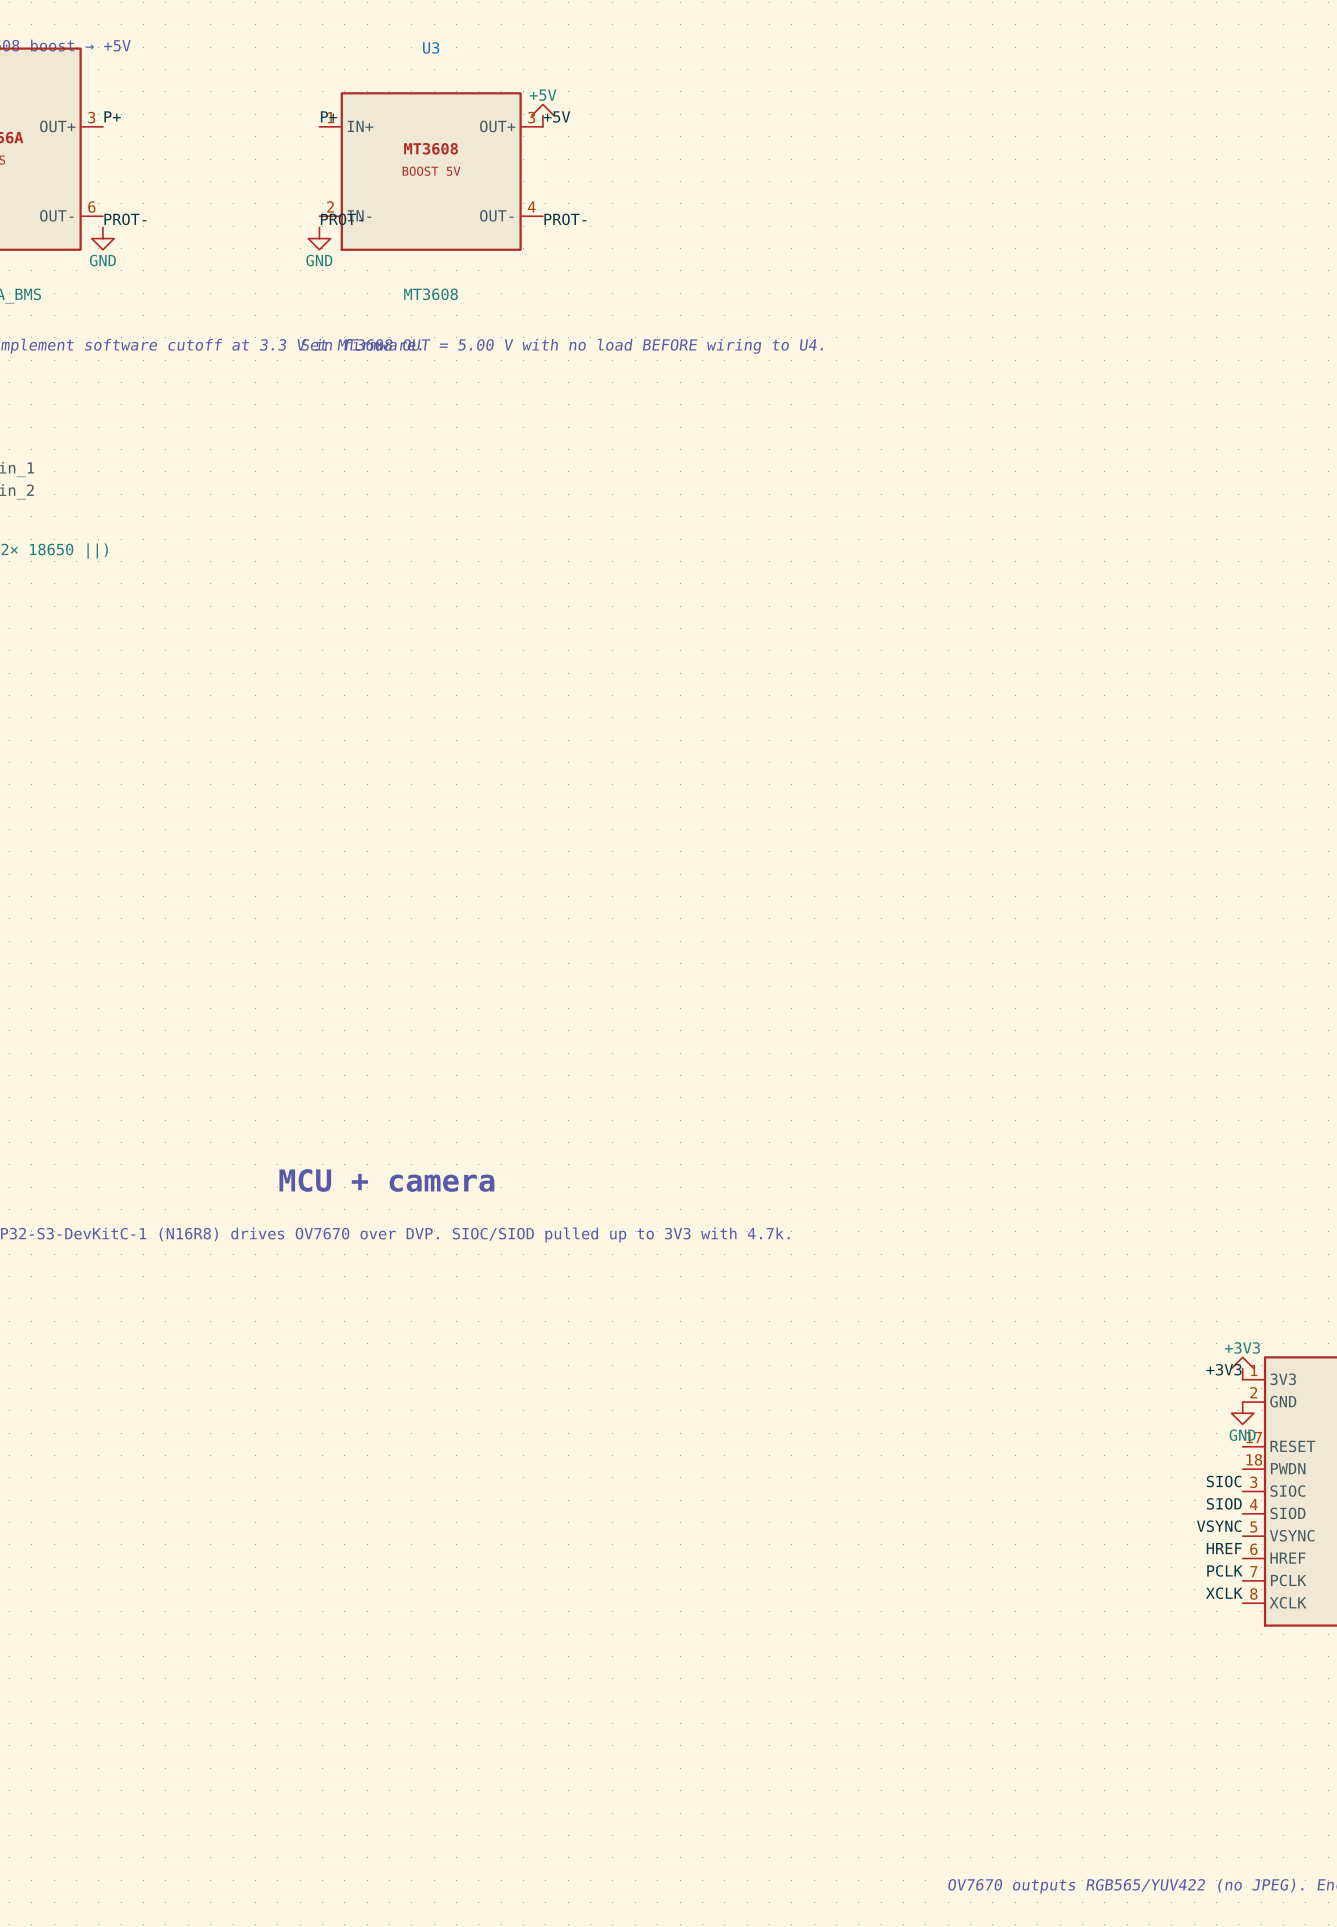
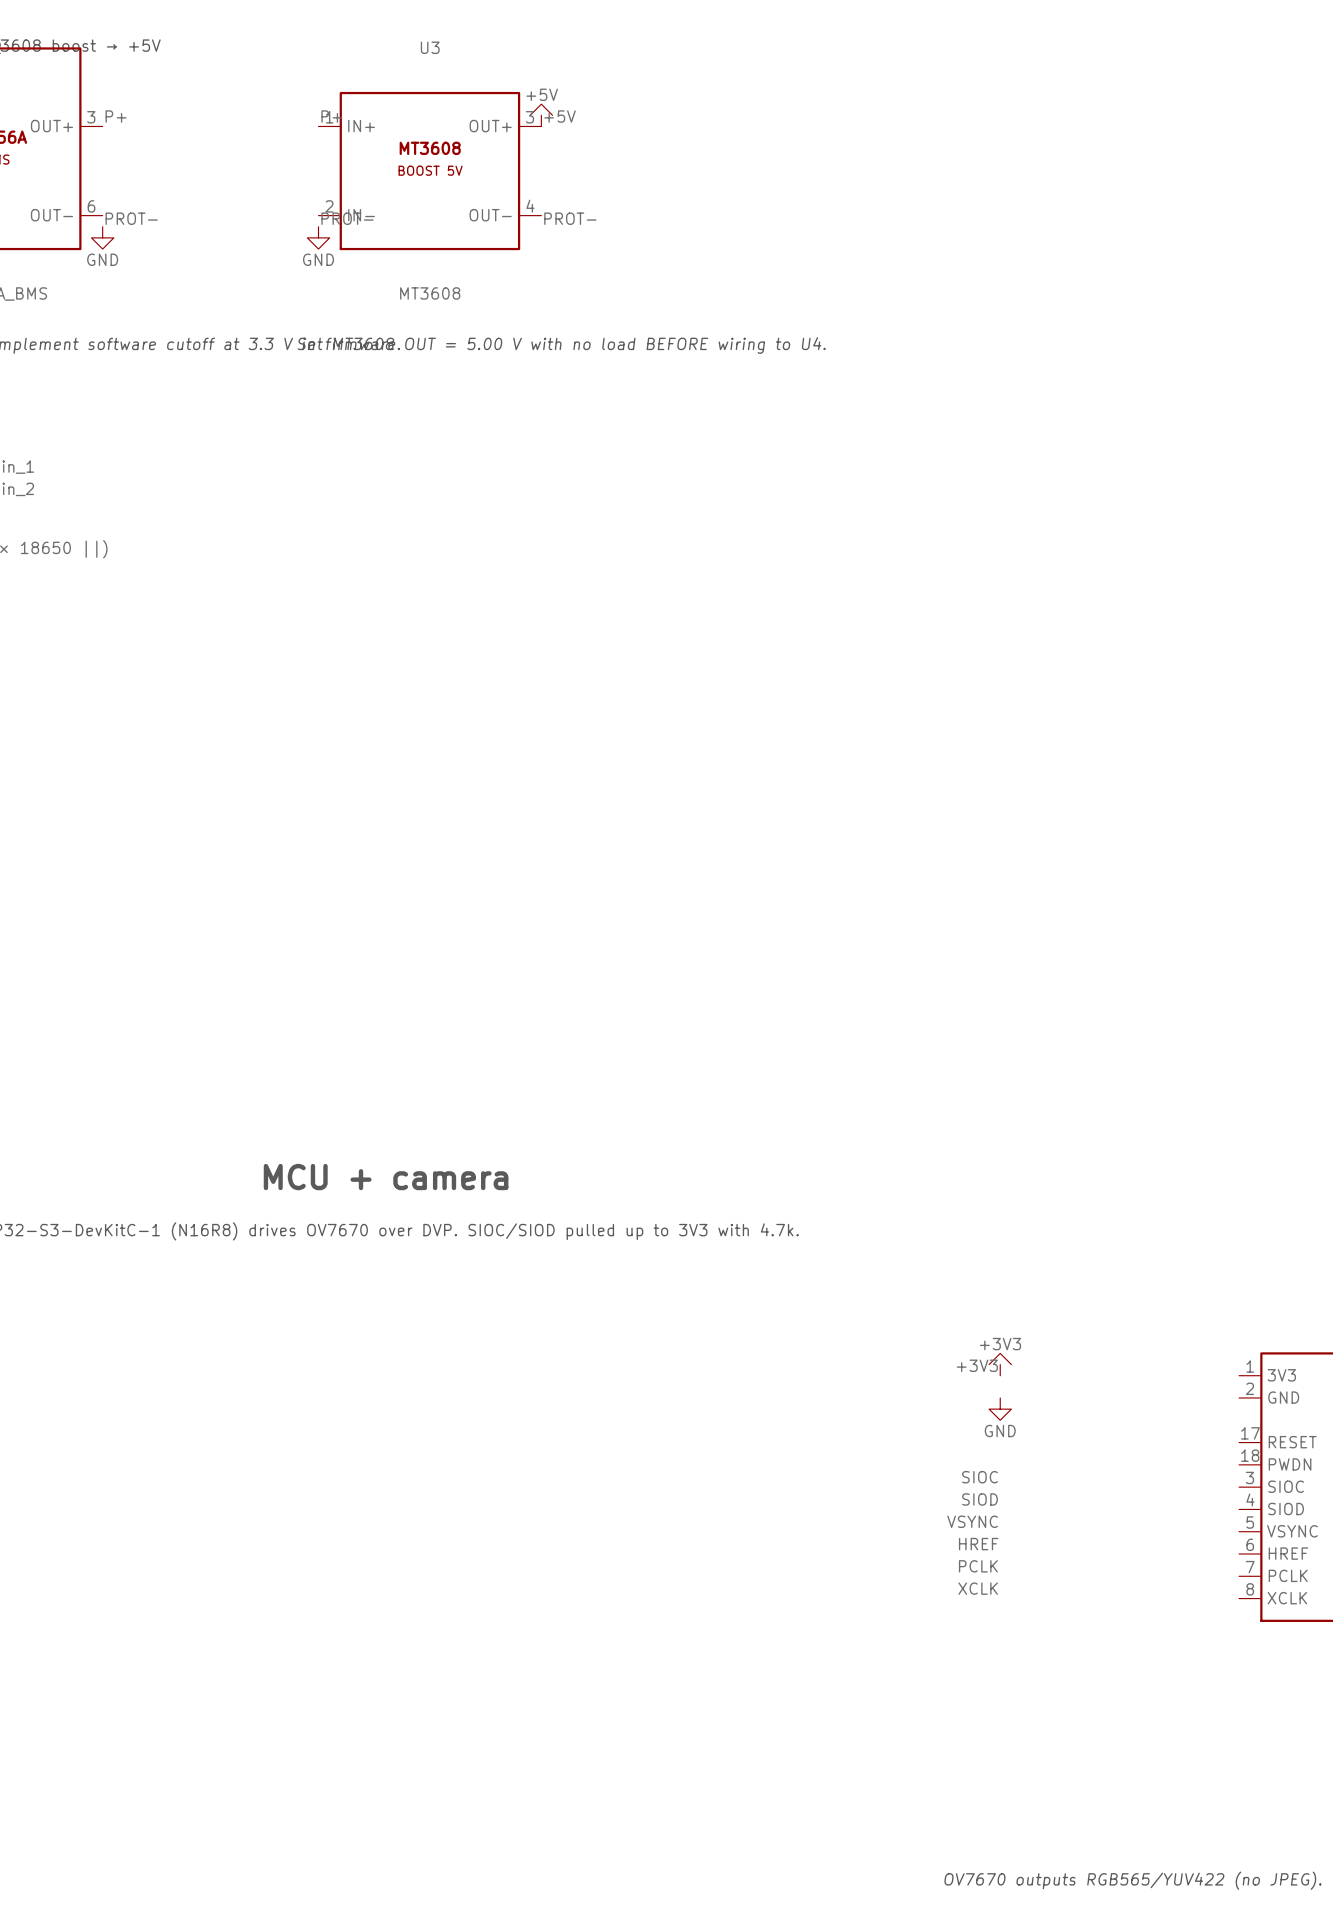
power symbol: none -> +3V3 (1000, 1364)
power symbol: +3V3 (1242, 1368) -> none
label: none -> +3V3 (977, 1365)
label: +3V3 (1223, 1369) -> none
power symbol: none -> GND (1000, 1409)
power symbol: GND (1242, 1413) -> none
label: none -> SIOC (980, 1477)
label: SIOC (1224, 1481) -> none
label: none -> SIOD (980, 1499)
label: SIOD (1224, 1503) -> none
label: none -> VSYNC (972, 1521)
label: VSYNC (1219, 1526) -> none
label: none -> HREF (978, 1544)
label: HREF (1224, 1548) -> none
label: none -> PCLK (978, 1566)
label: PCLK (1224, 1570) -> none
label: none -> XCLK (978, 1588)
label: XCLK (1224, 1593) -> none

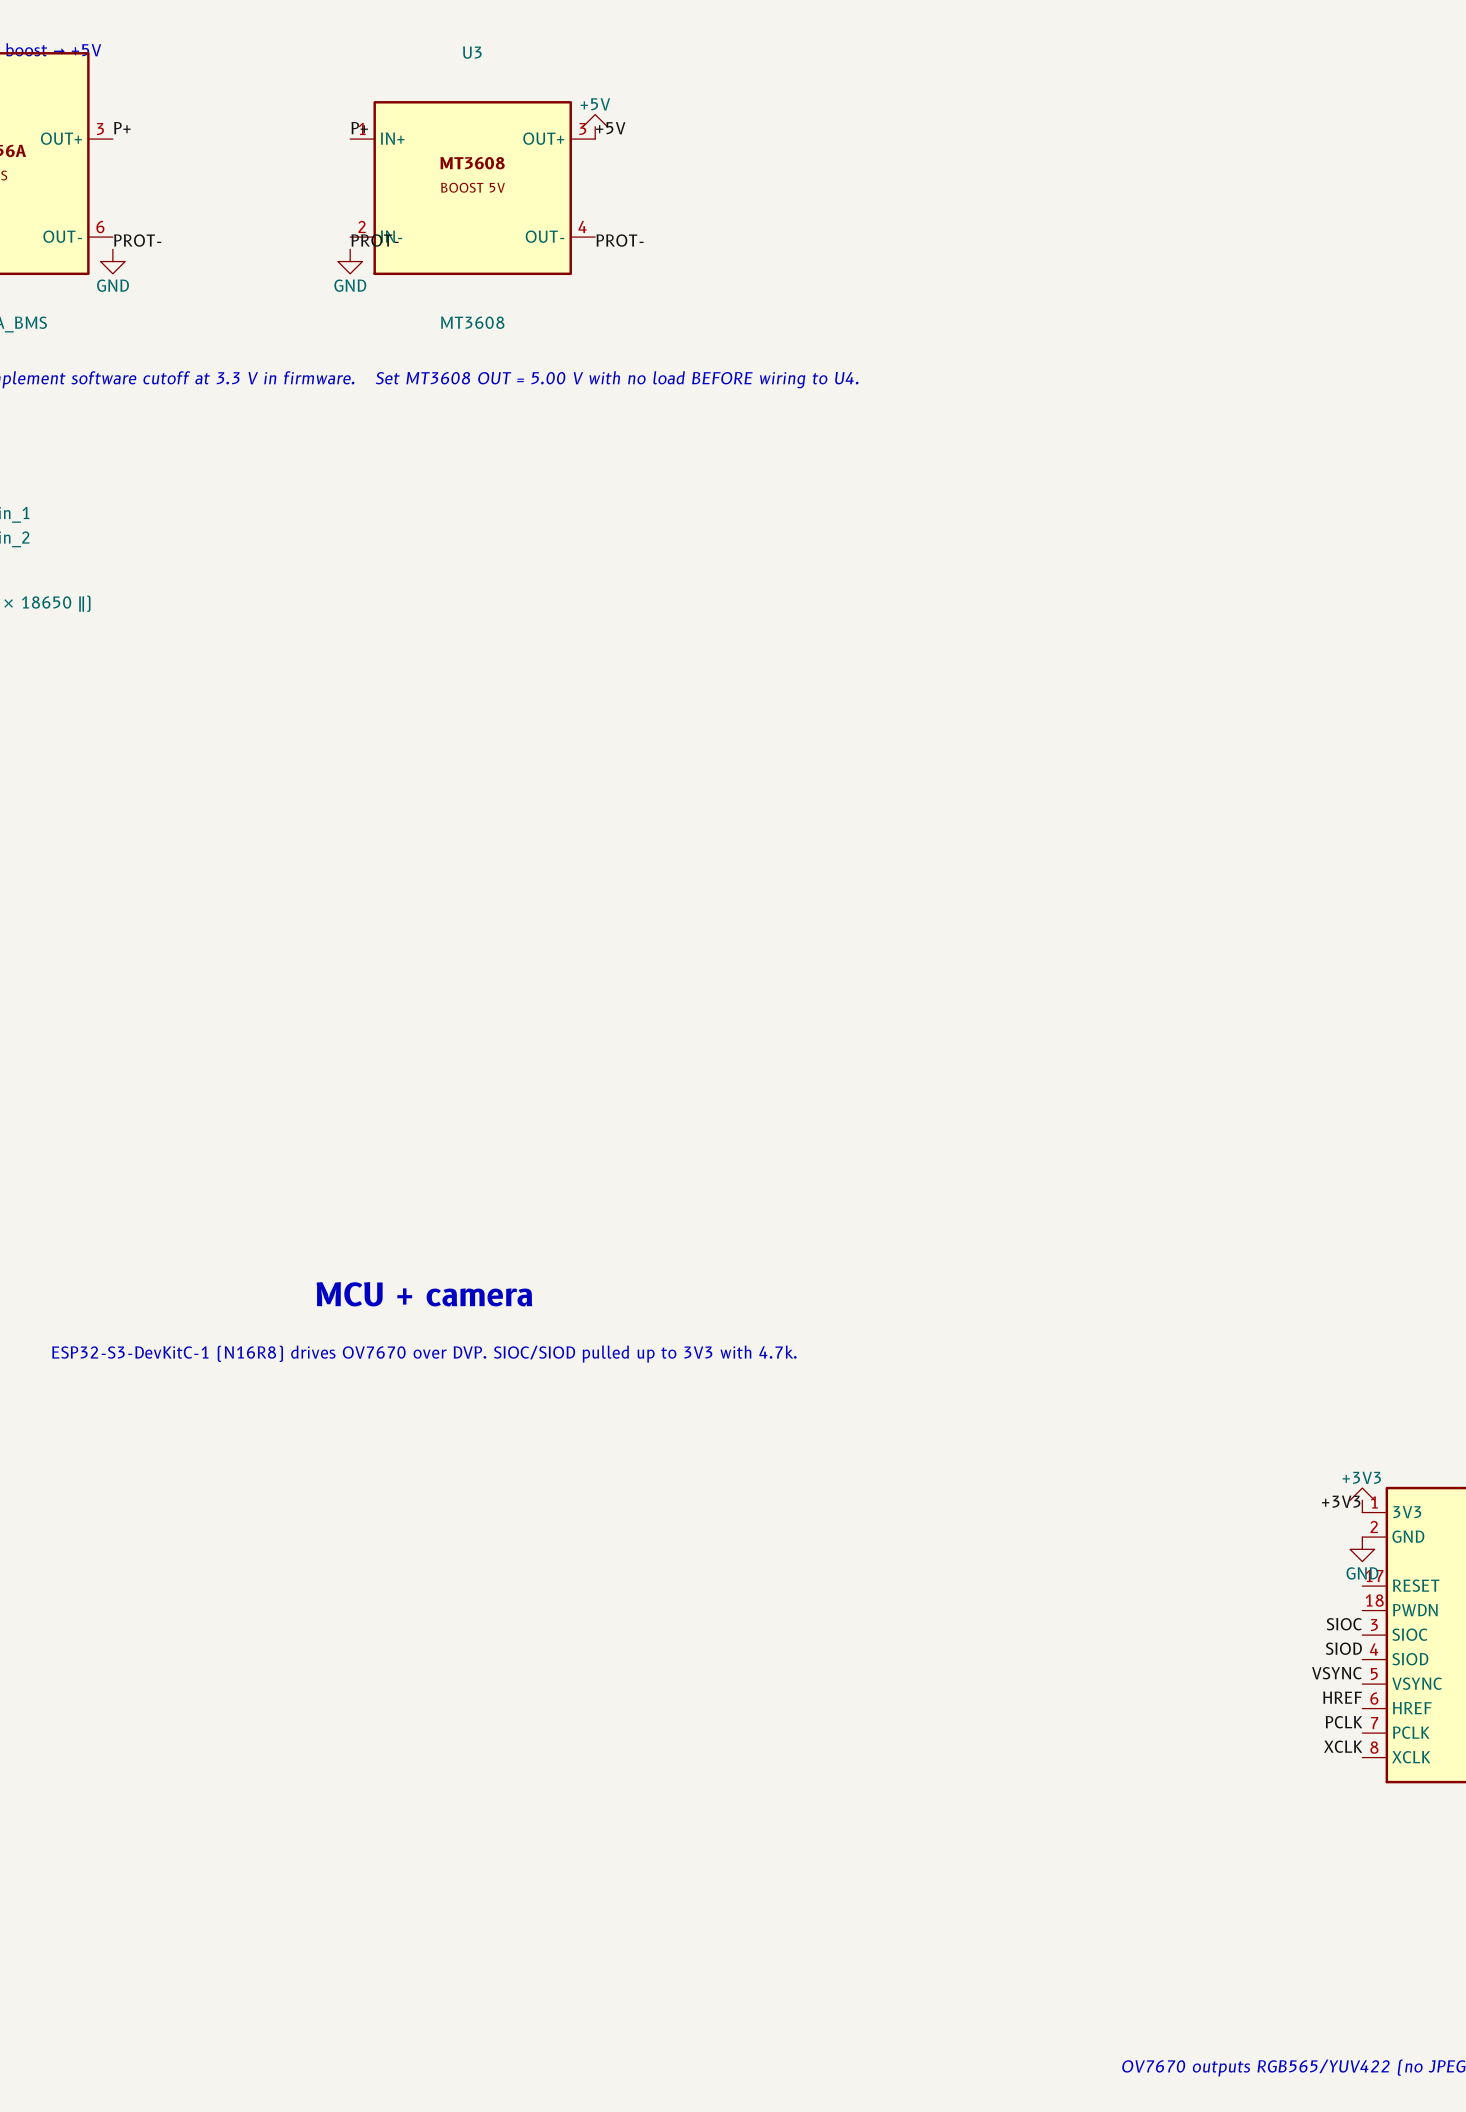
power symbol: +3V3 (1000, 1364) -> none
power symbol: none -> +3V3 (1362, 1500)
label: +3V3 (977, 1365) -> none
label: none -> +3V3 (1341, 1501)
power symbol: GND (1000, 1409) -> none
power symbol: none -> GND (1362, 1549)
label: SIOC (980, 1477) -> none
label: none -> SIOC (1344, 1624)
label: SIOD (980, 1499) -> none
label: none -> SIOD (1343, 1648)
label: VSYNC (972, 1521) -> none
label: none -> VSYNC (1336, 1673)
label: HREF (978, 1544) -> none
label: none -> HREF (1342, 1697)
label: PCLK (978, 1566) -> none
label: none -> PCLK (1343, 1722)
label: XCLK (978, 1588) -> none
label: none -> XCLK (1343, 1746)

